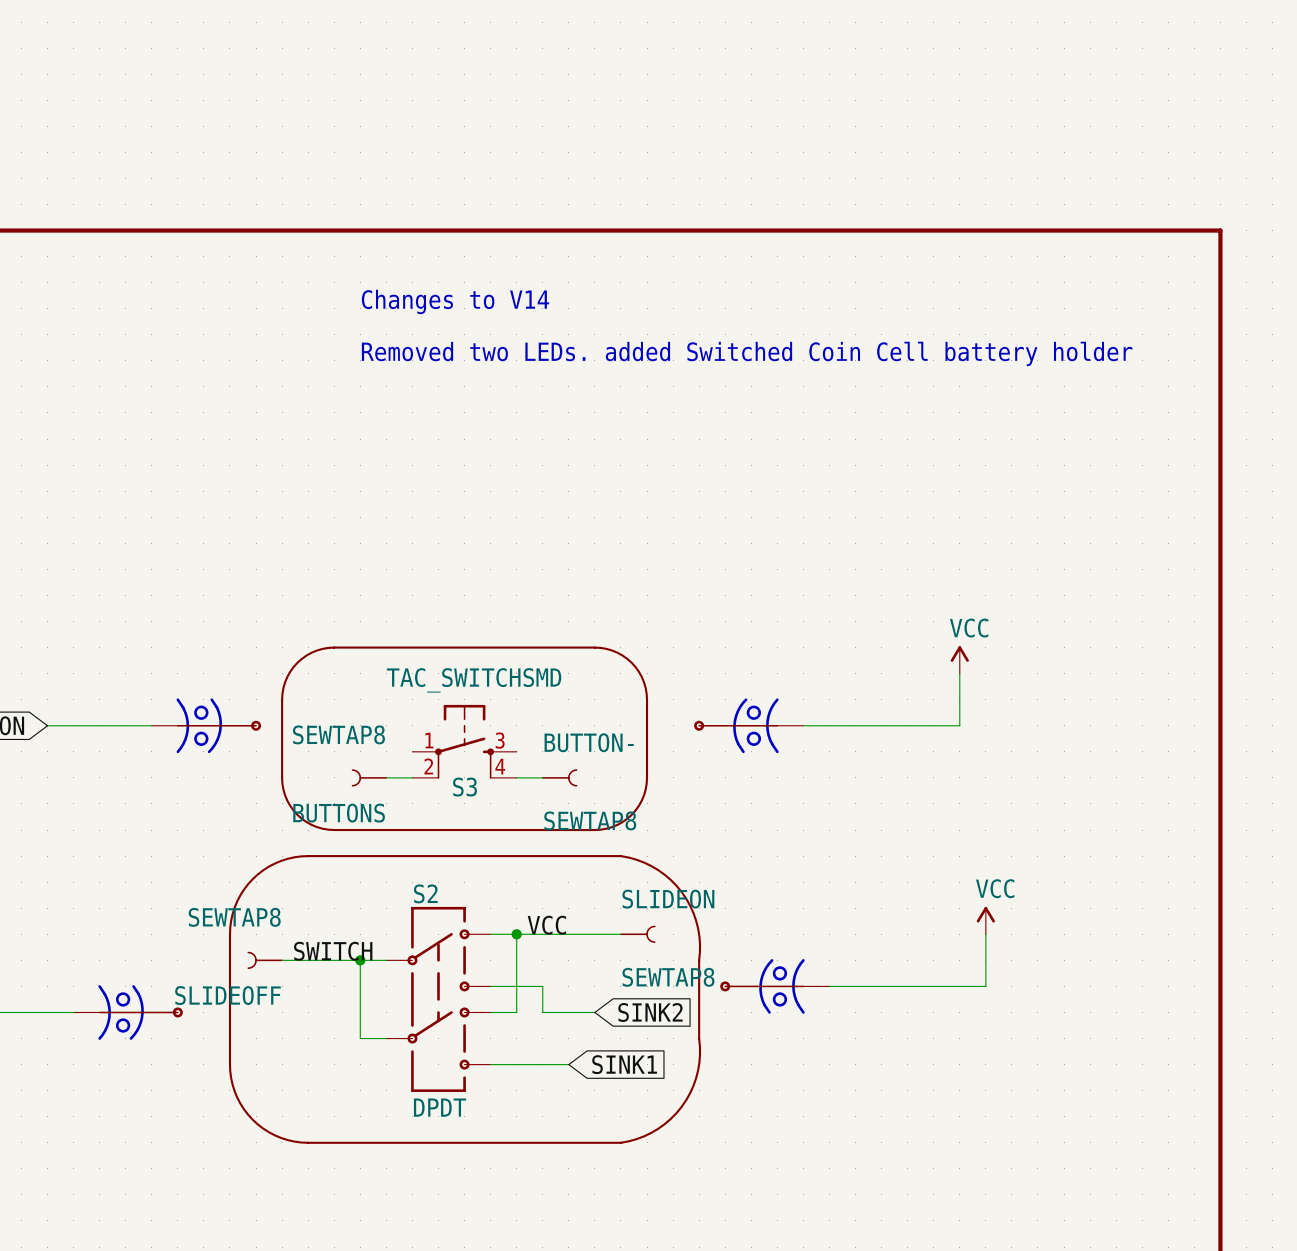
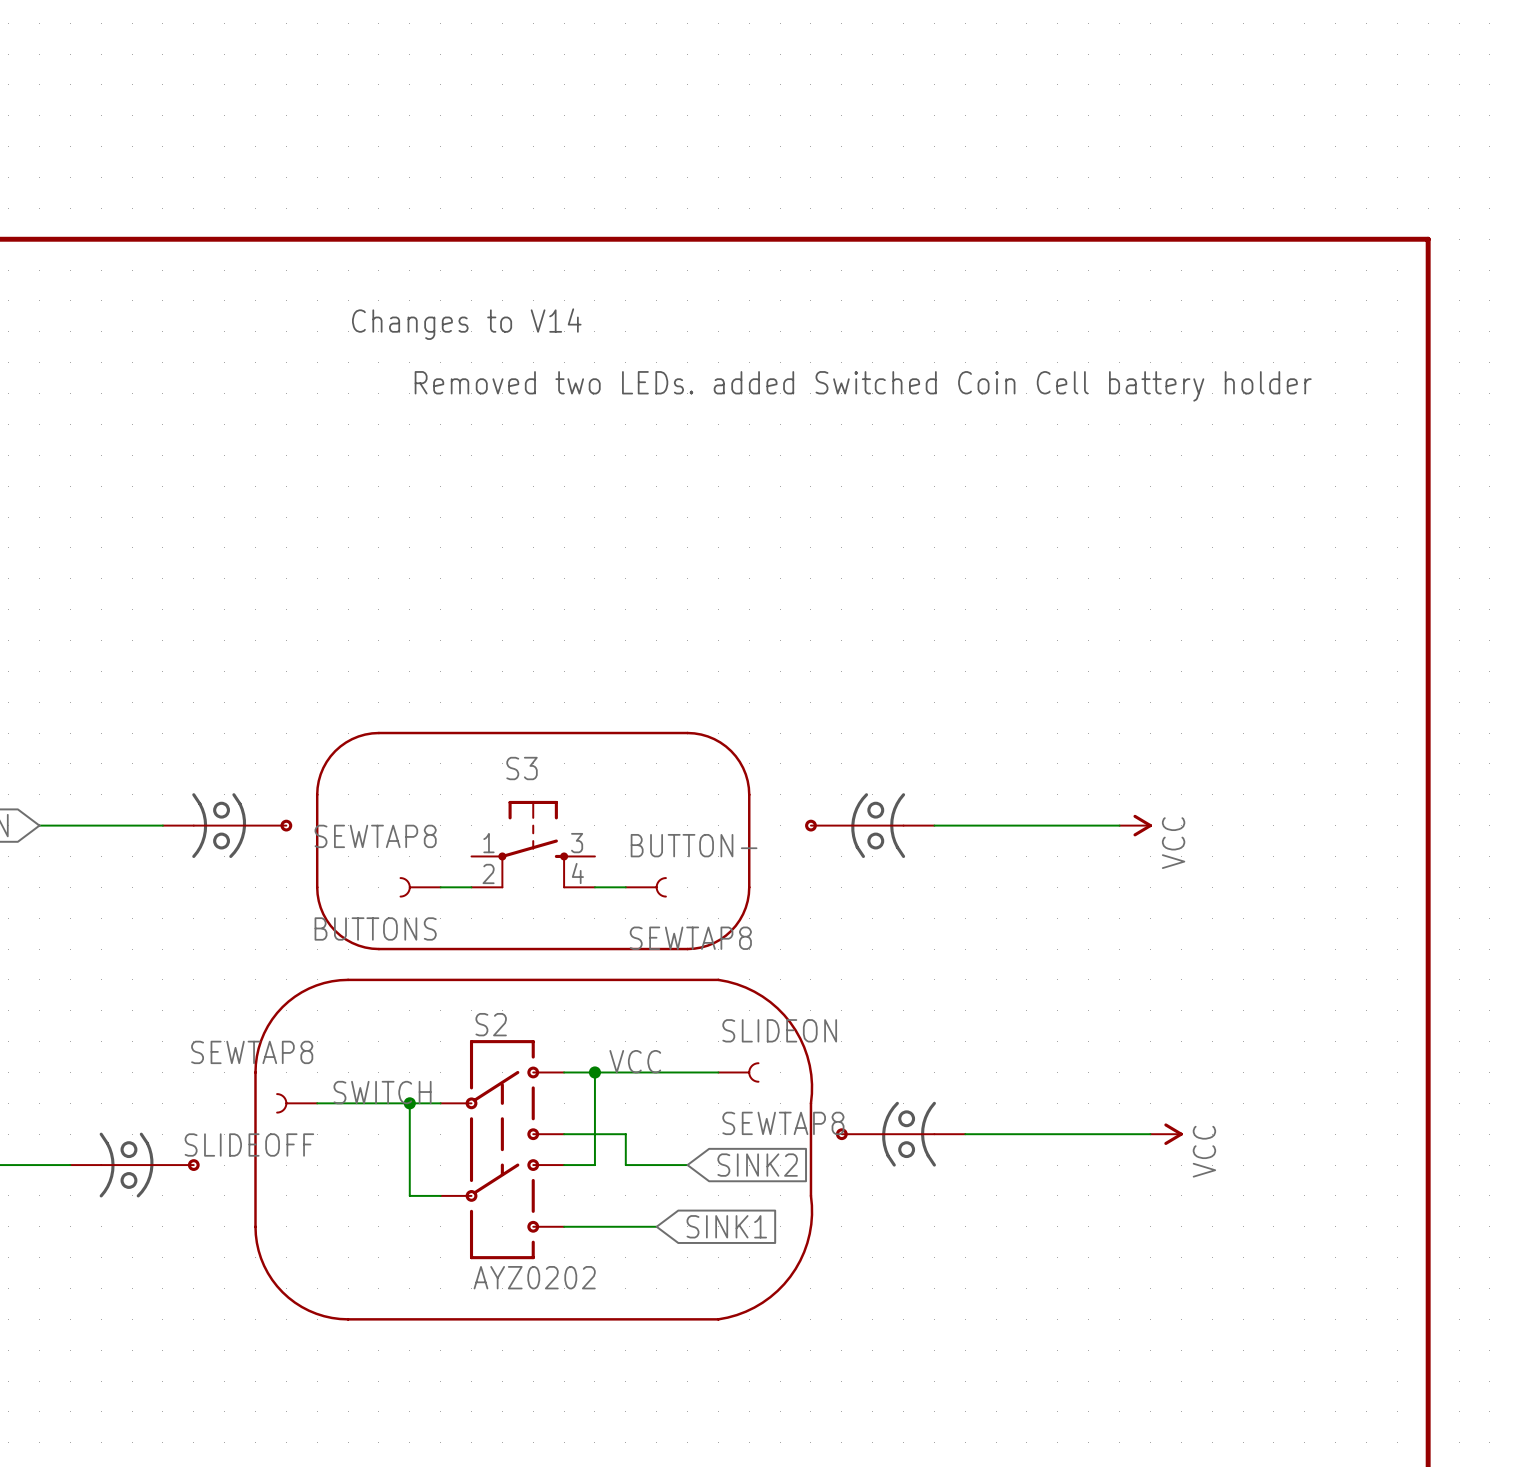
text position: Changes to V14 (455, 301) -> Changes to V14 (466, 324)
power symbol rotation: 0° (959, 654) -> 90° clockwise (1142, 825)
power symbol position: VCC (959, 659) -> VCC (1135, 825)
wire: (959, 673) (959, 725) -> none
S3 value: TAC_SWITCHSMD (474, 680) -> none
S3 name position: S3 (465, 787) -> S3 (522, 768)
power symbol rotation: 0° (985, 914) -> 90° clockwise (1173, 1134)
power symbol position: VCC (985, 920) -> VCC (1166, 1134)
wire: (985, 934) (985, 986) -> none
S2 value: DPDT (440, 1107) -> AYZ0202 (534, 1277)

